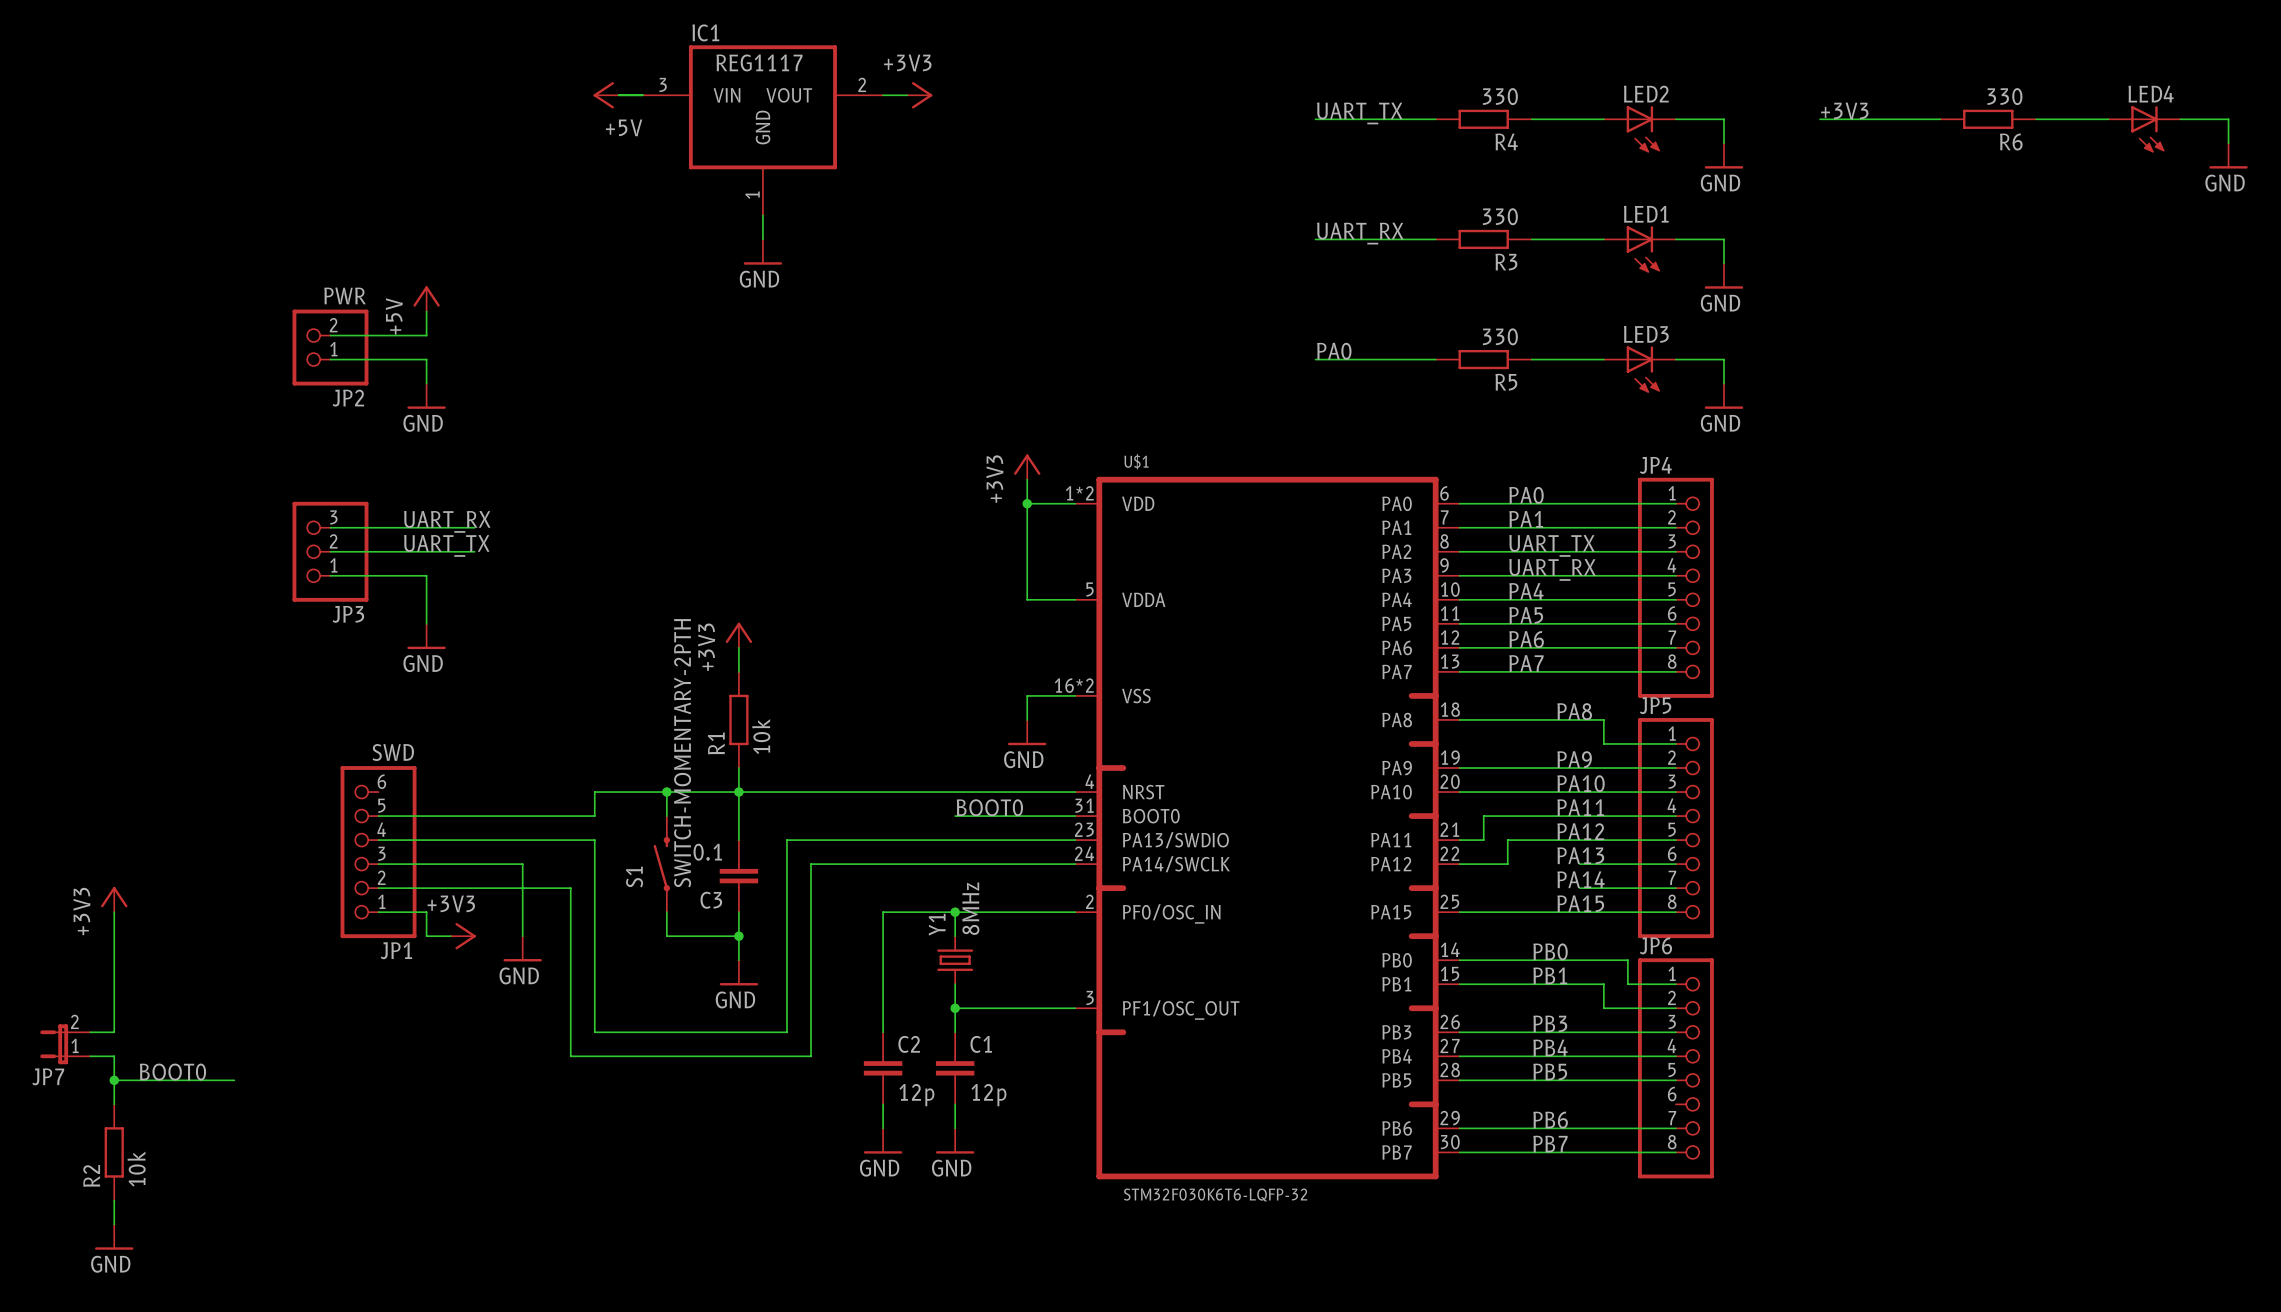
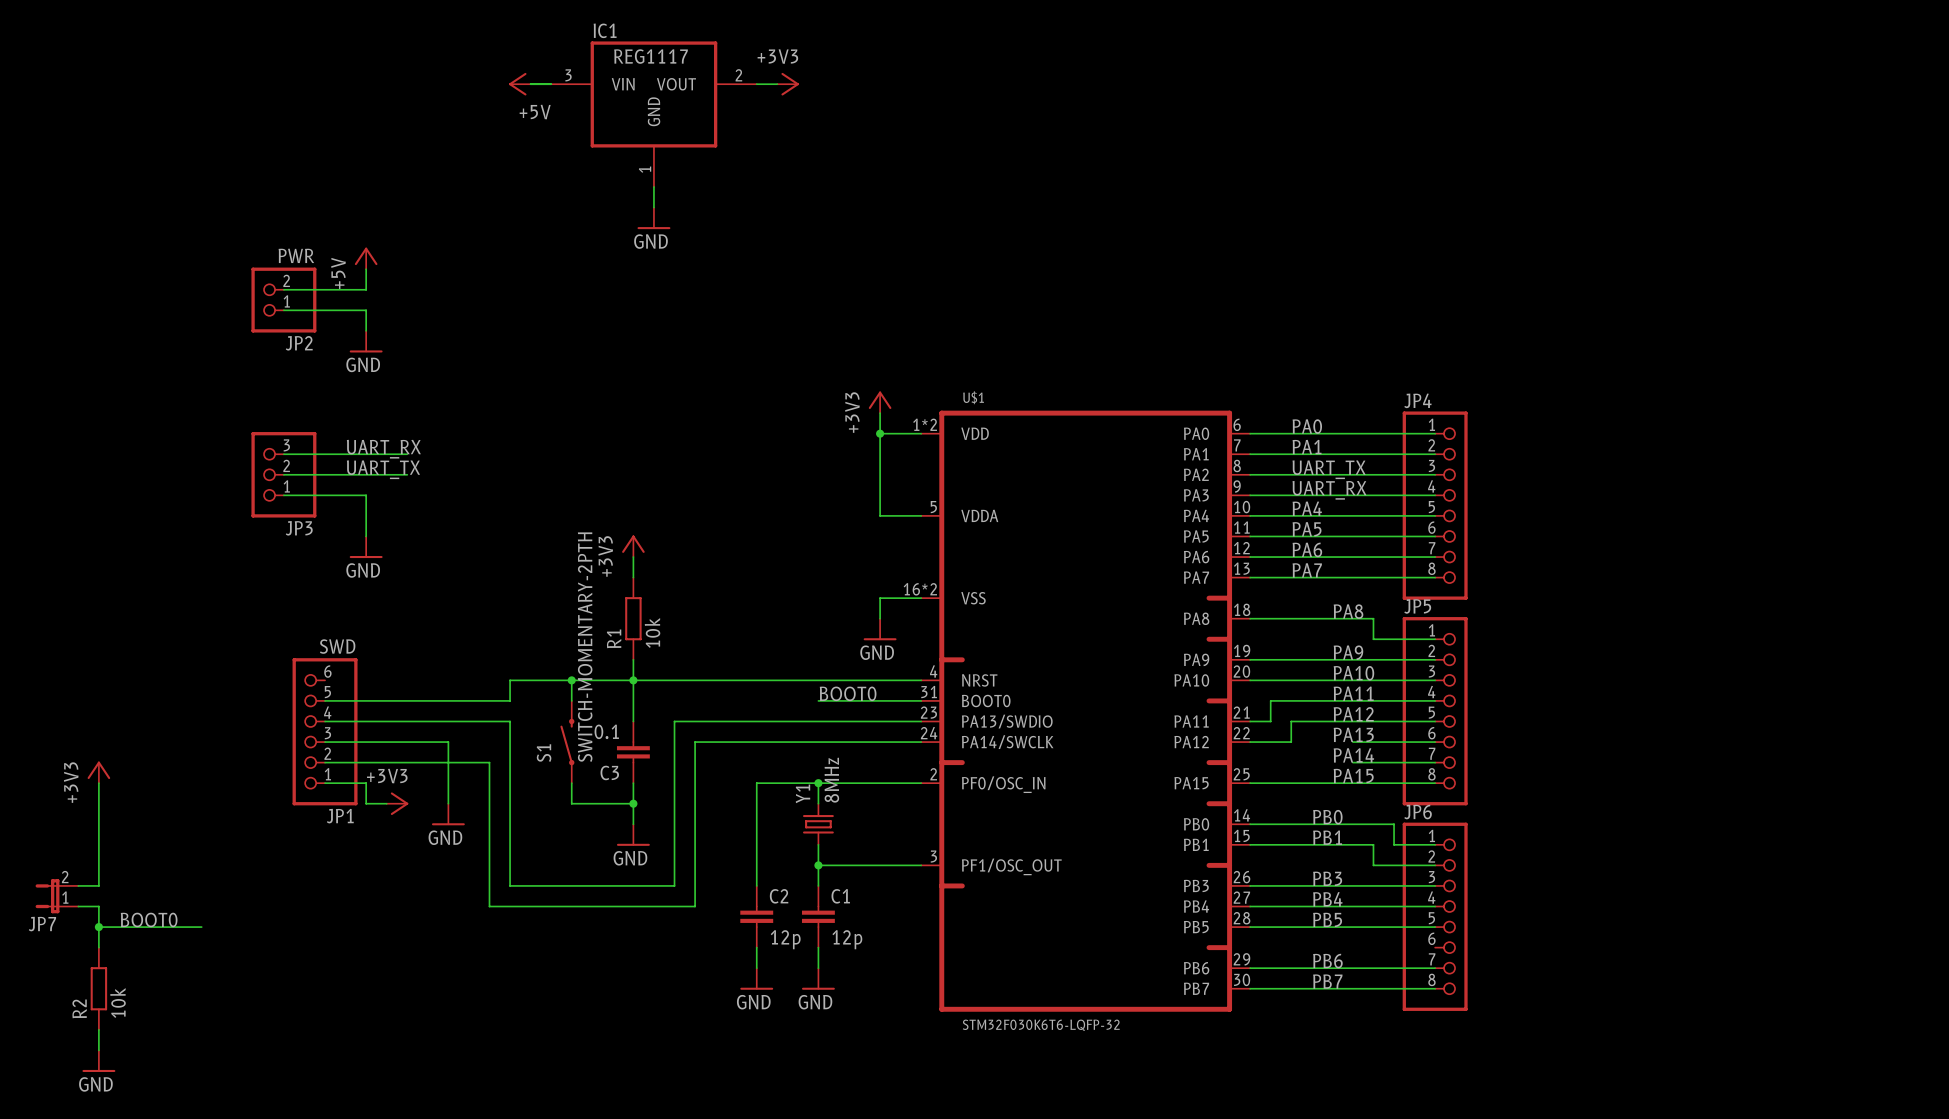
label: +3V3 (1844, 111) -> none
label: UART_TX (1359, 113) -> none
wire: (1315, 119) (1435, 119) -> none
R4: 330 (1483, 119) -> none
wire: (1531, 119) (1603, 119) -> none
wire: (1675, 119) (1723, 119) (1723, 143) -> none
wire: (1820, 119) (1940, 119) -> none
R6: 330 (1988, 119) -> none
wire: (2036, 119) (2108, 119) -> none
wire: (2180, 119) (2228, 119) (2228, 143) -> none
LED2: (1639, 129) -> none
LED4: (2144, 129) -> none
power symbol: GND (1723, 155) -> none
power symbol: GND (2228, 155) -> none
label: UART_RX (1360, 233) -> none
wire: (1315, 239) (1435, 239) -> none
R3: 330 (1483, 239) -> none
wire: (1531, 239) (1603, 239) -> none
wire: (1675, 239) (1723, 239) (1723, 263) -> none
LED1: (1639, 249) -> none
power symbol: GND (1723, 276) -> none
label: PA0 (1334, 351) -> none
wire: (1315, 359) (1435, 359) -> none
R5: 330 (1483, 359) -> none
wire: (1531, 359) (1603, 359) -> none
wire: (1675, 359) (1723, 359) (1723, 383) -> none
LED3: (1639, 369) -> none
power symbol: GND (1723, 396) -> none

